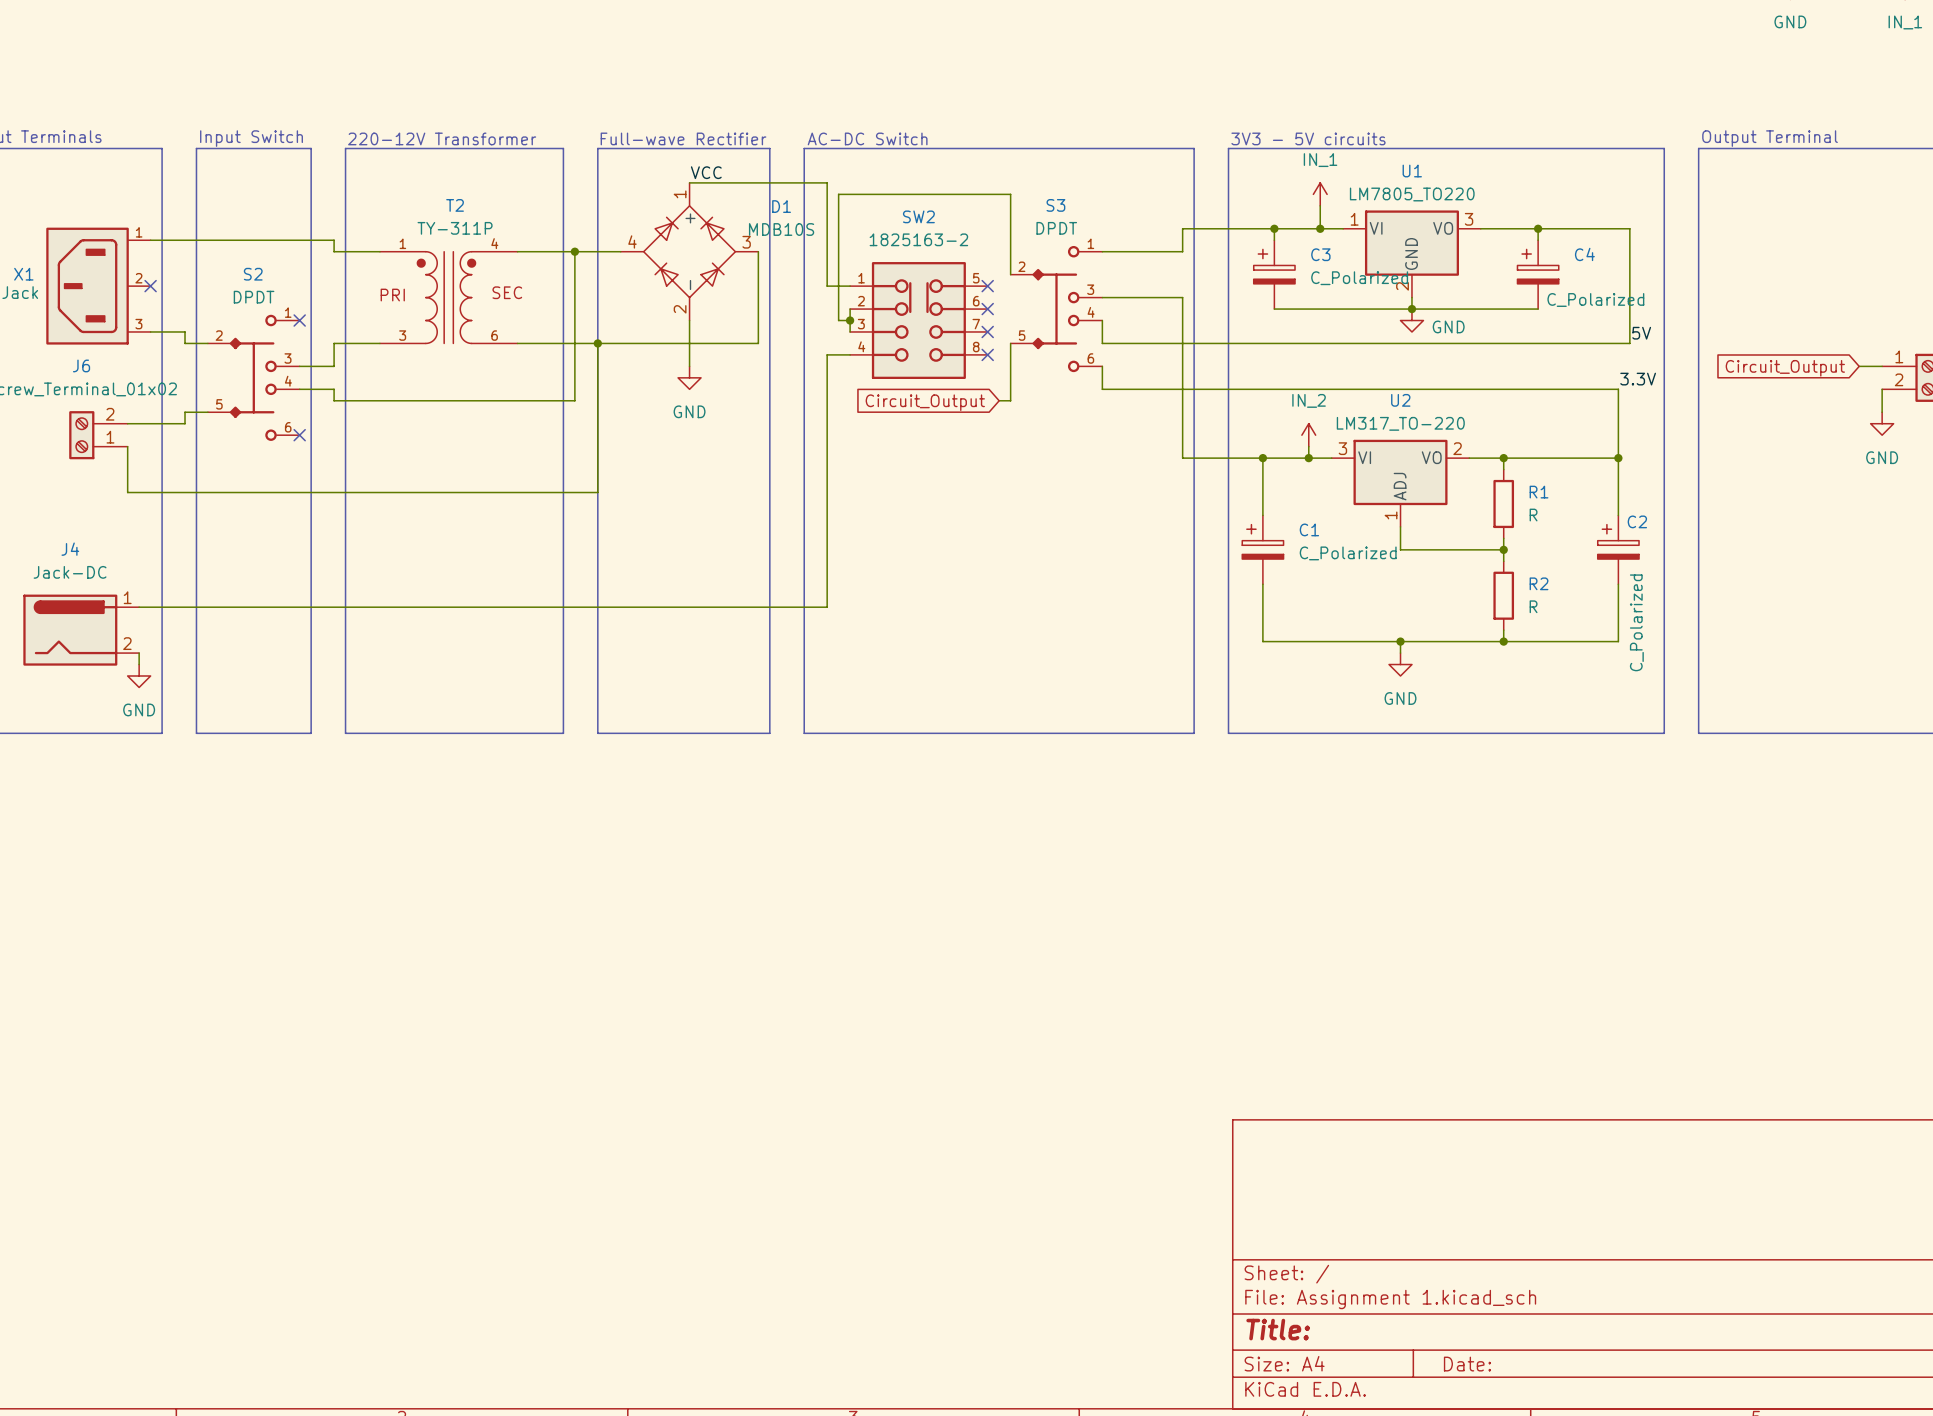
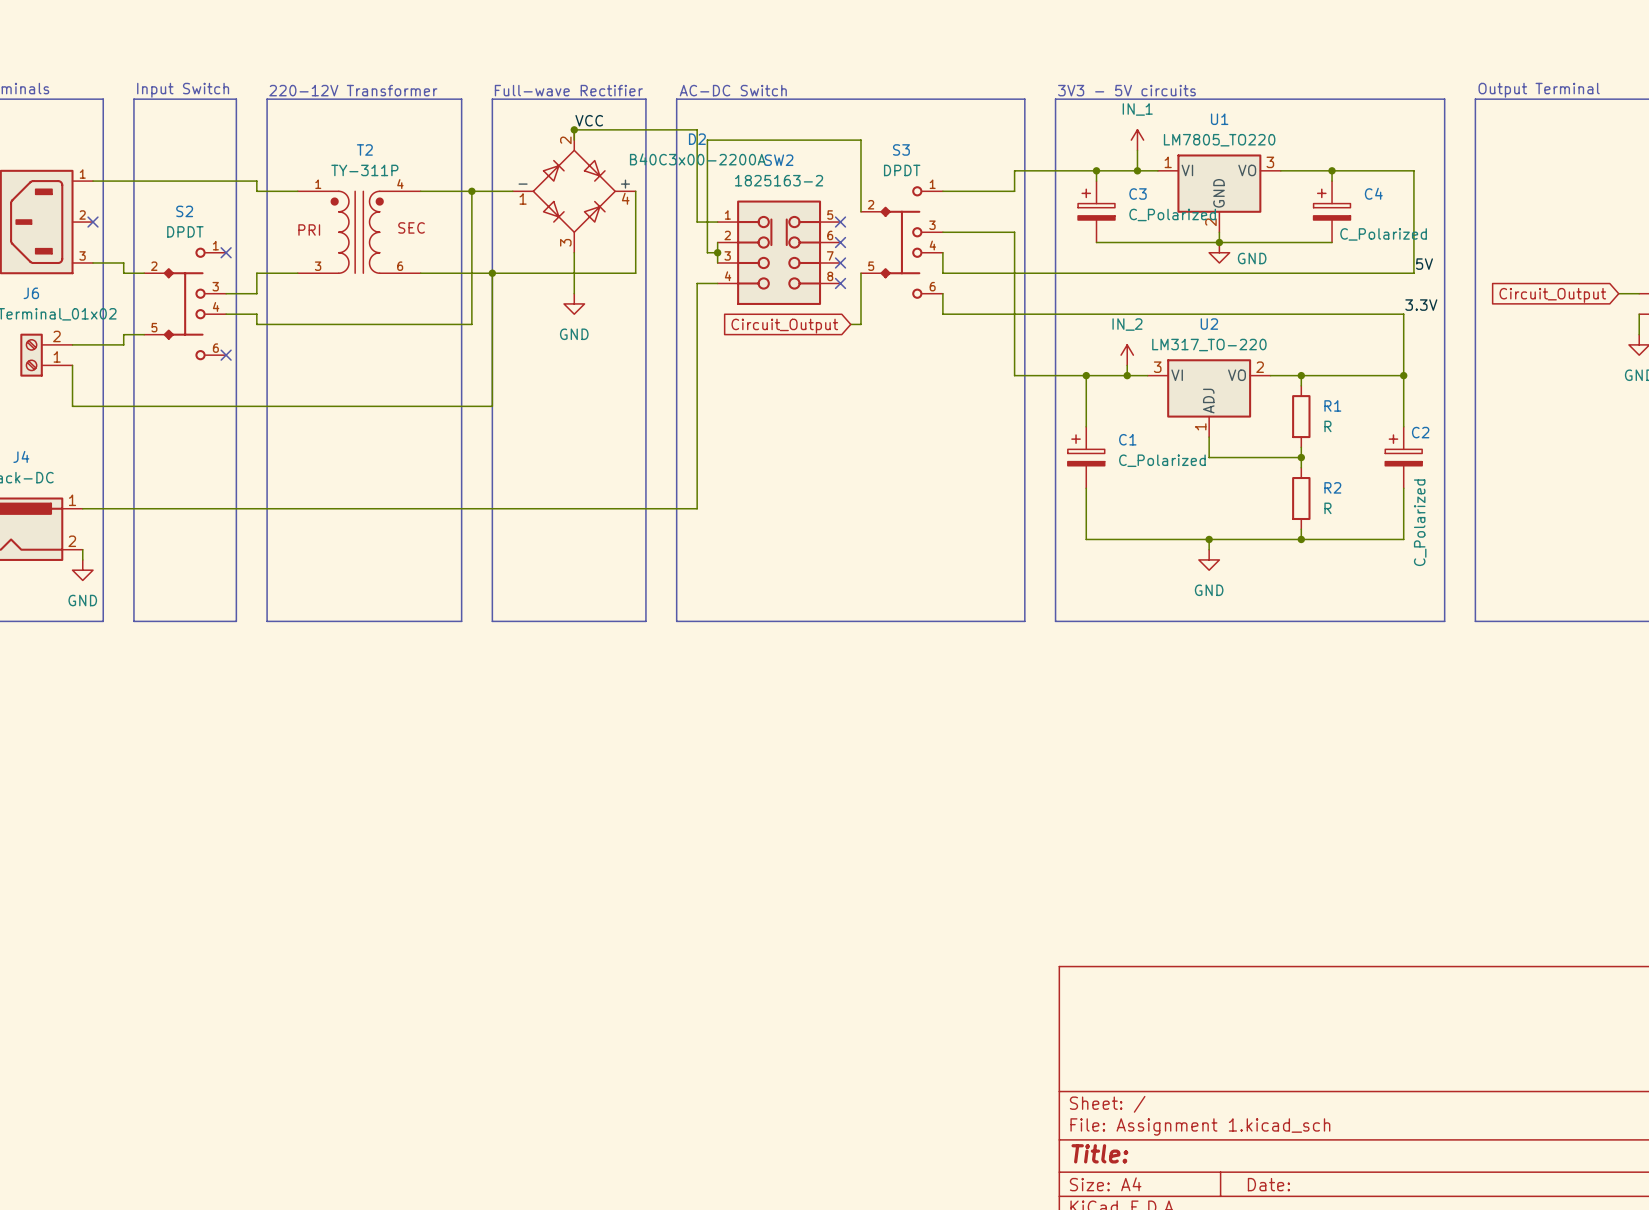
junction: none -> (574, 129)
D1: MDB10S (689, 251) -> none
D2: none -> B40C3x00-2200A (574, 191)

